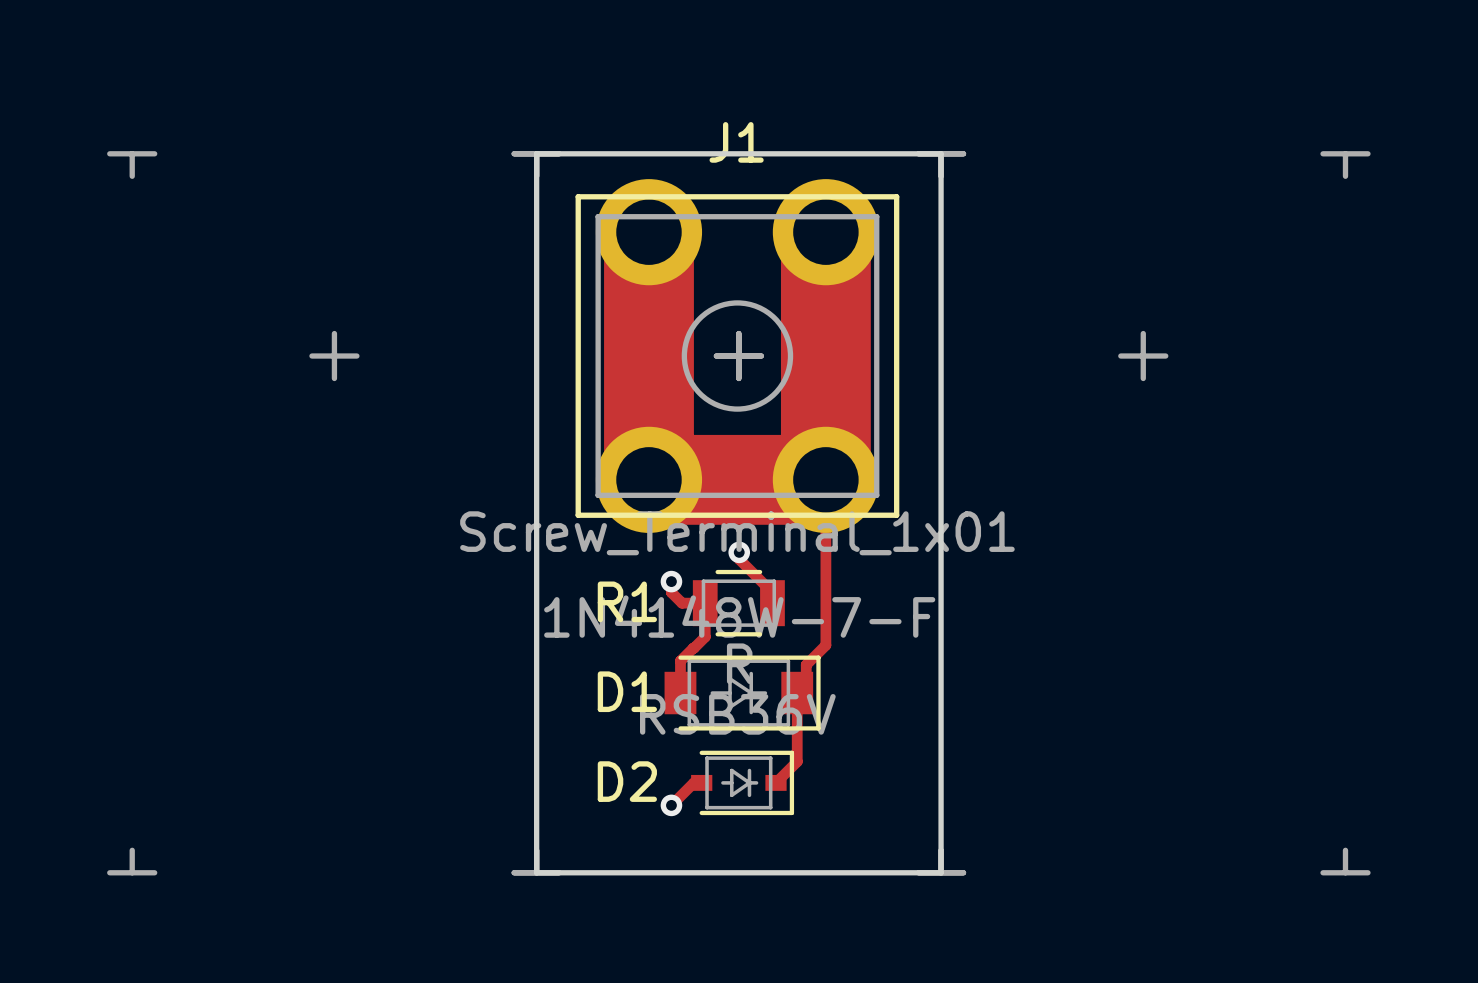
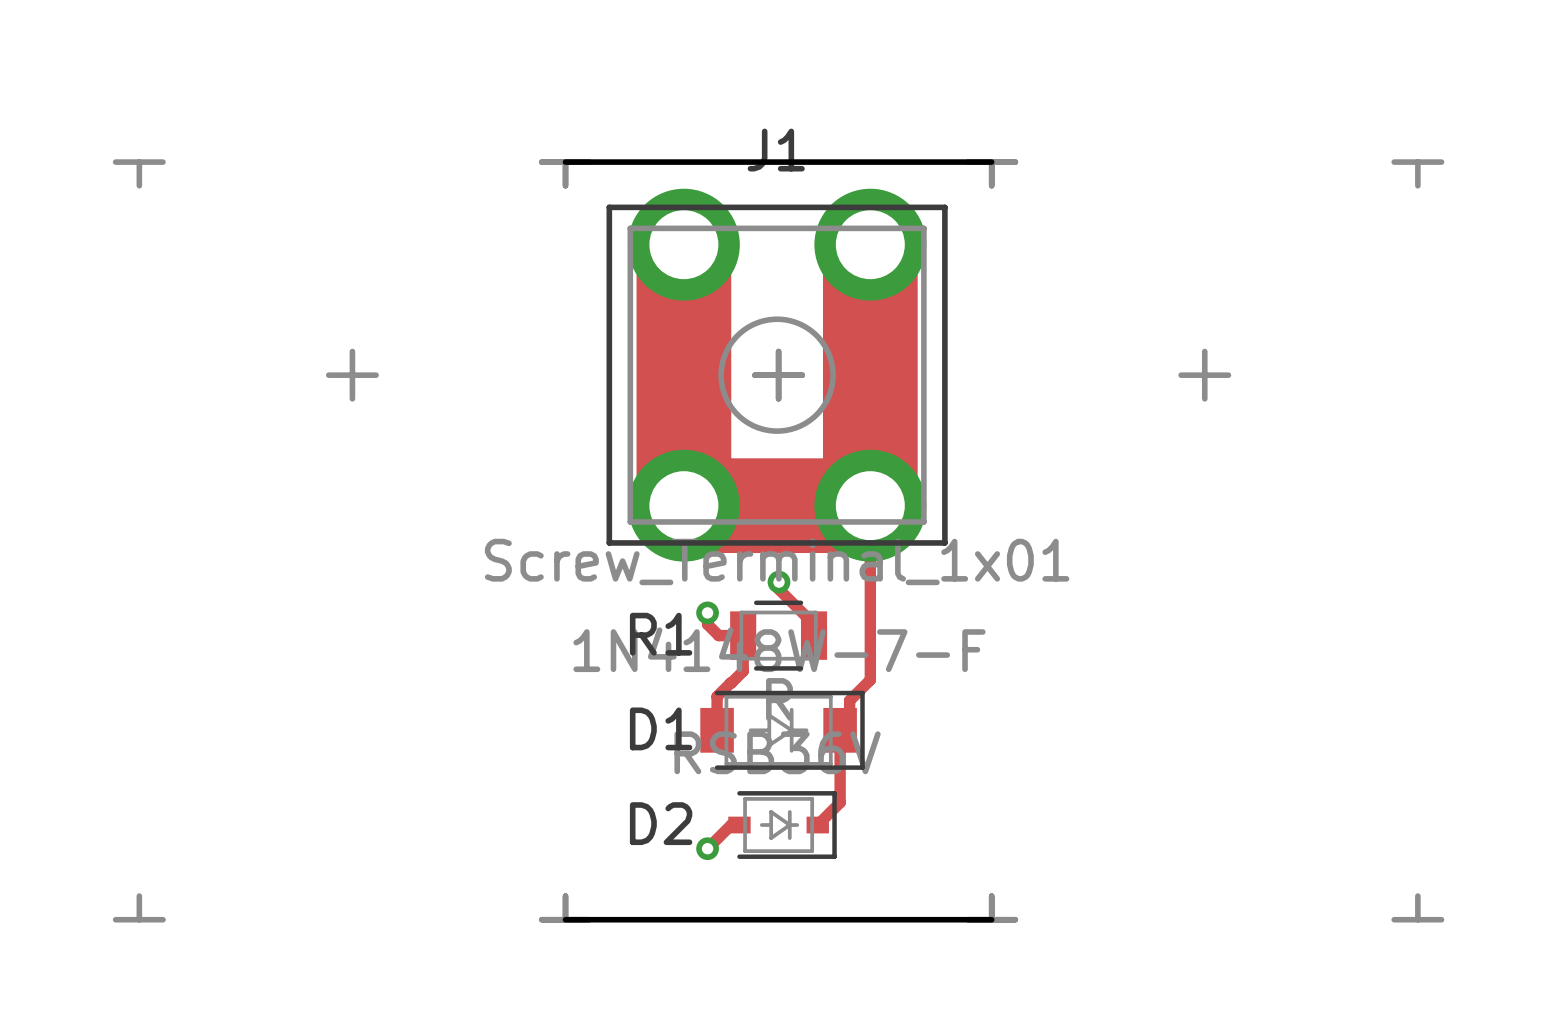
board edge: (536, 153) (536, 872) -> none
board edge: (941, 153) (941, 872) -> none

